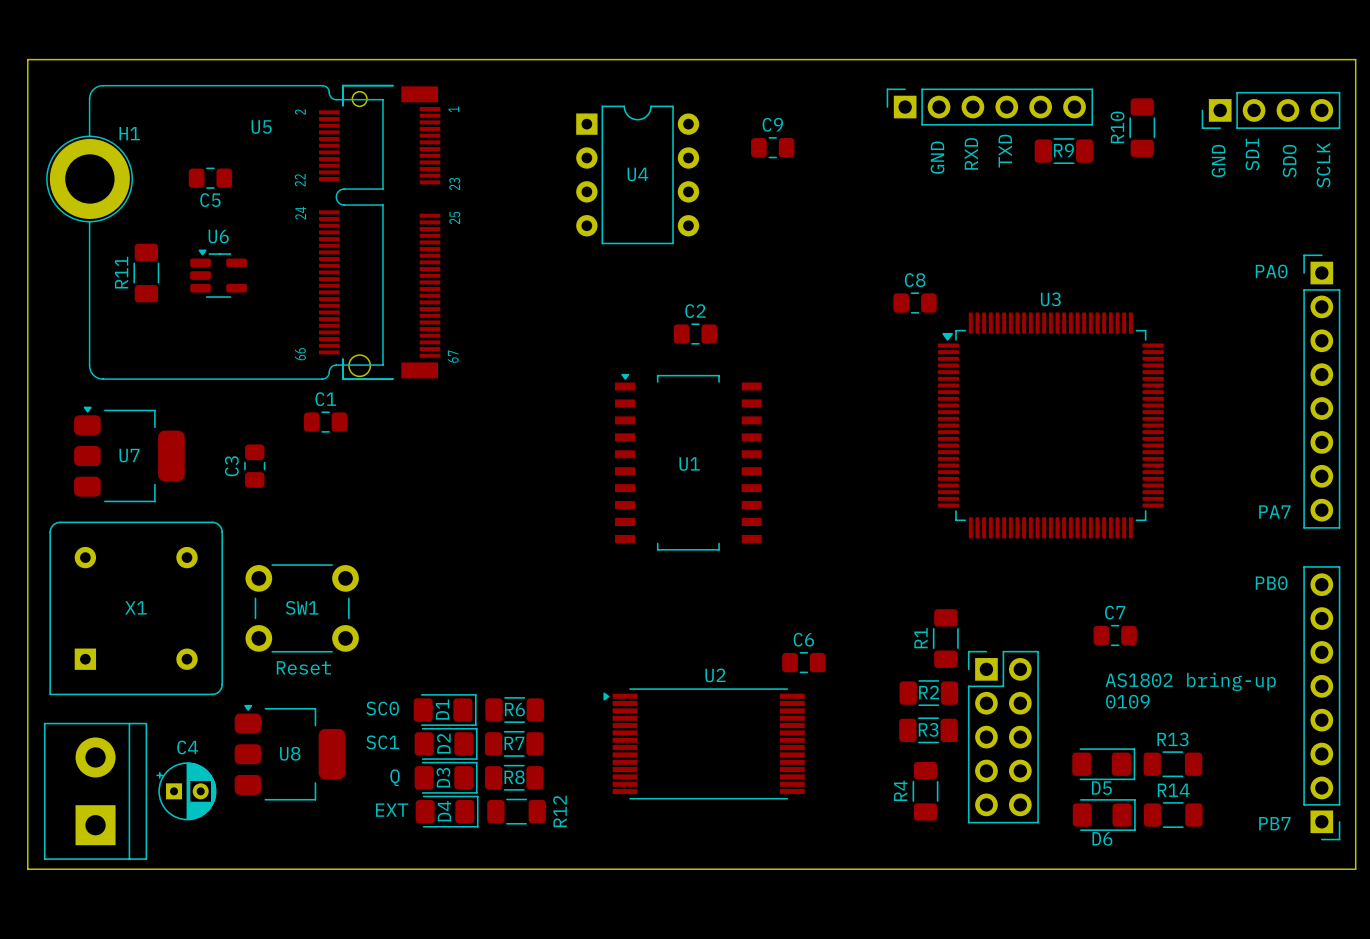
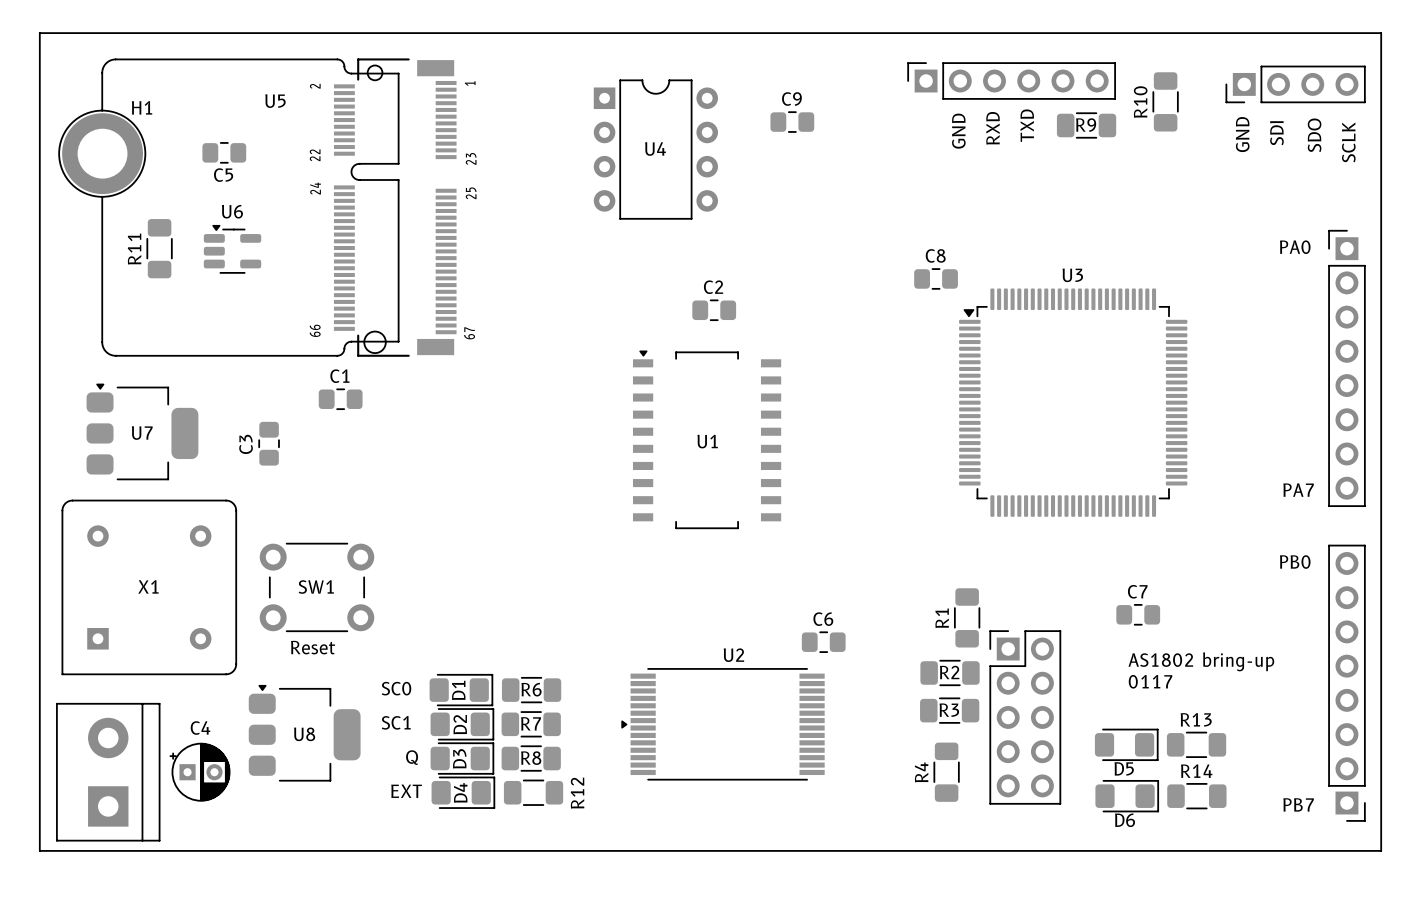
U2 footprint: [603, 688, 805, 800] -> [621, 668, 825, 781]
text: 0109 (1127, 701) -> 0117 (1150, 681)

